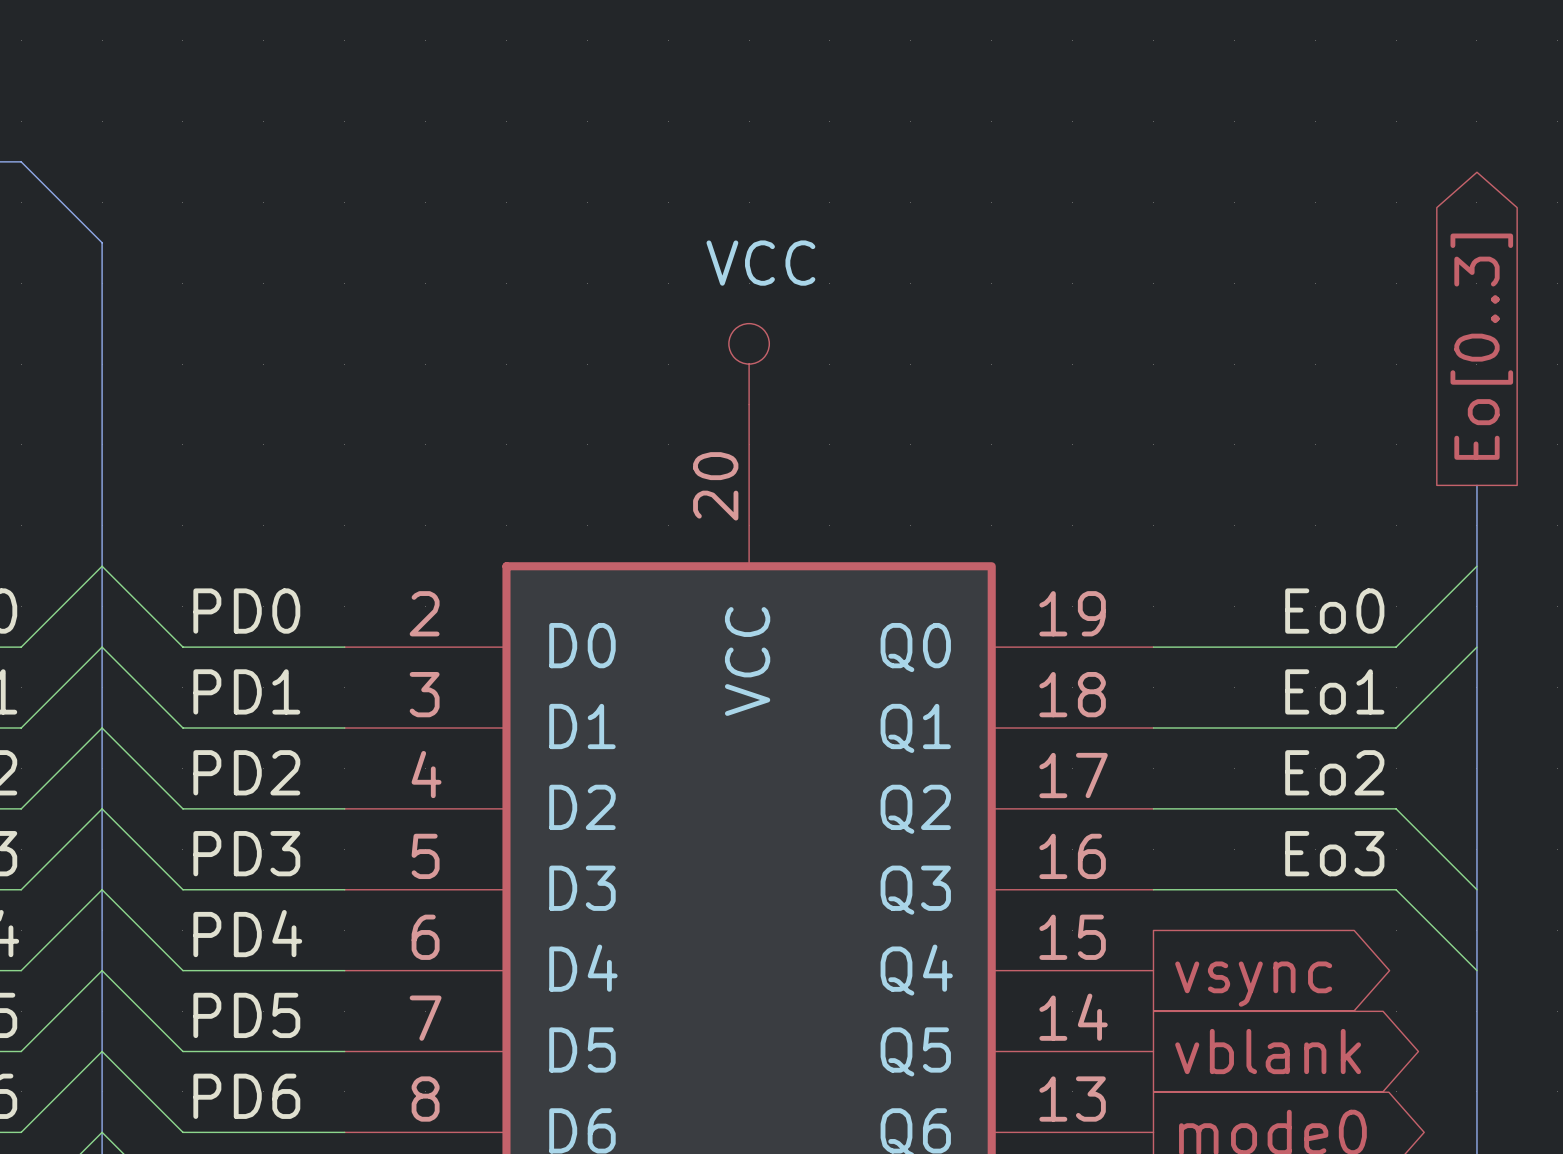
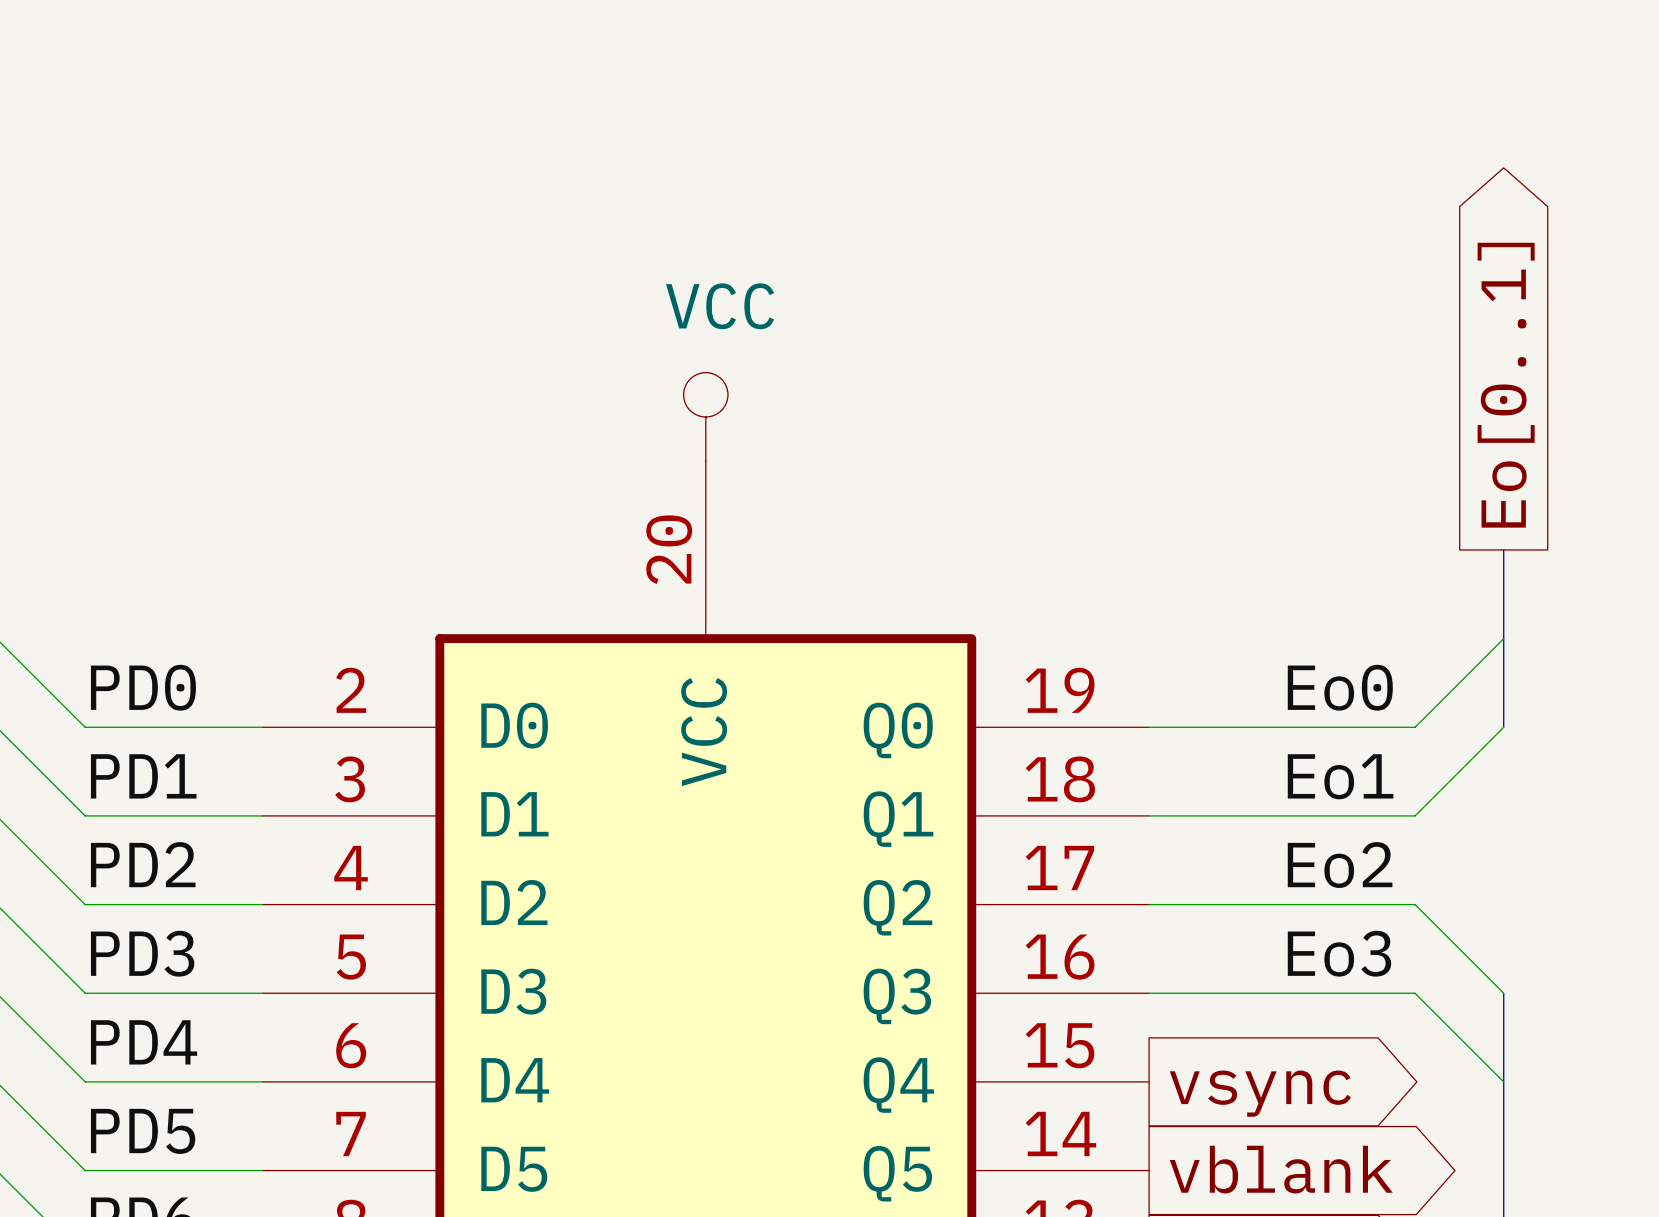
global label: Eo[0..3] (1481, 346) -> Eo[0..1] (1506, 385)
bus: (1476, 647) (1476, 889) -> none

